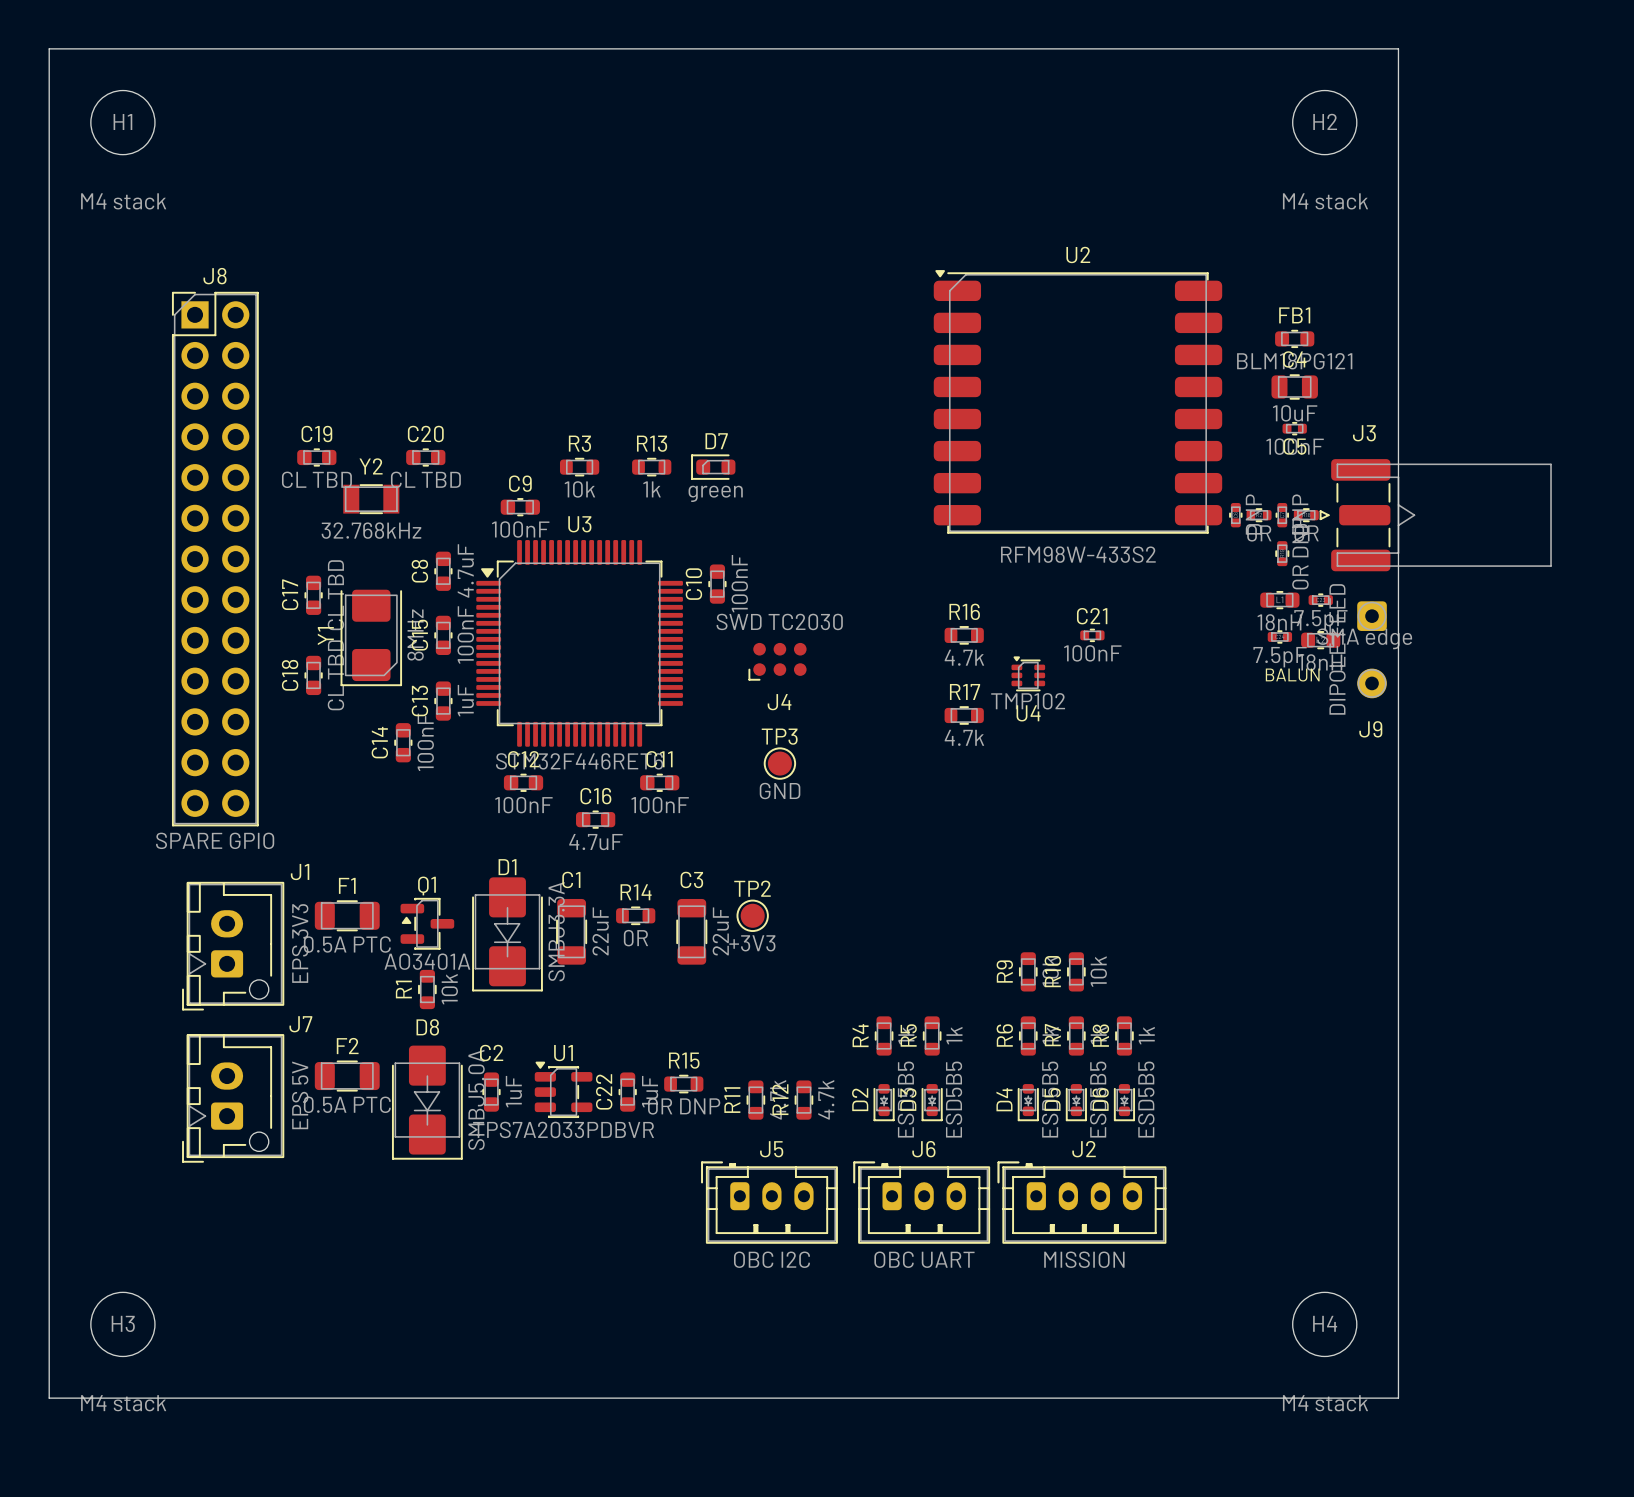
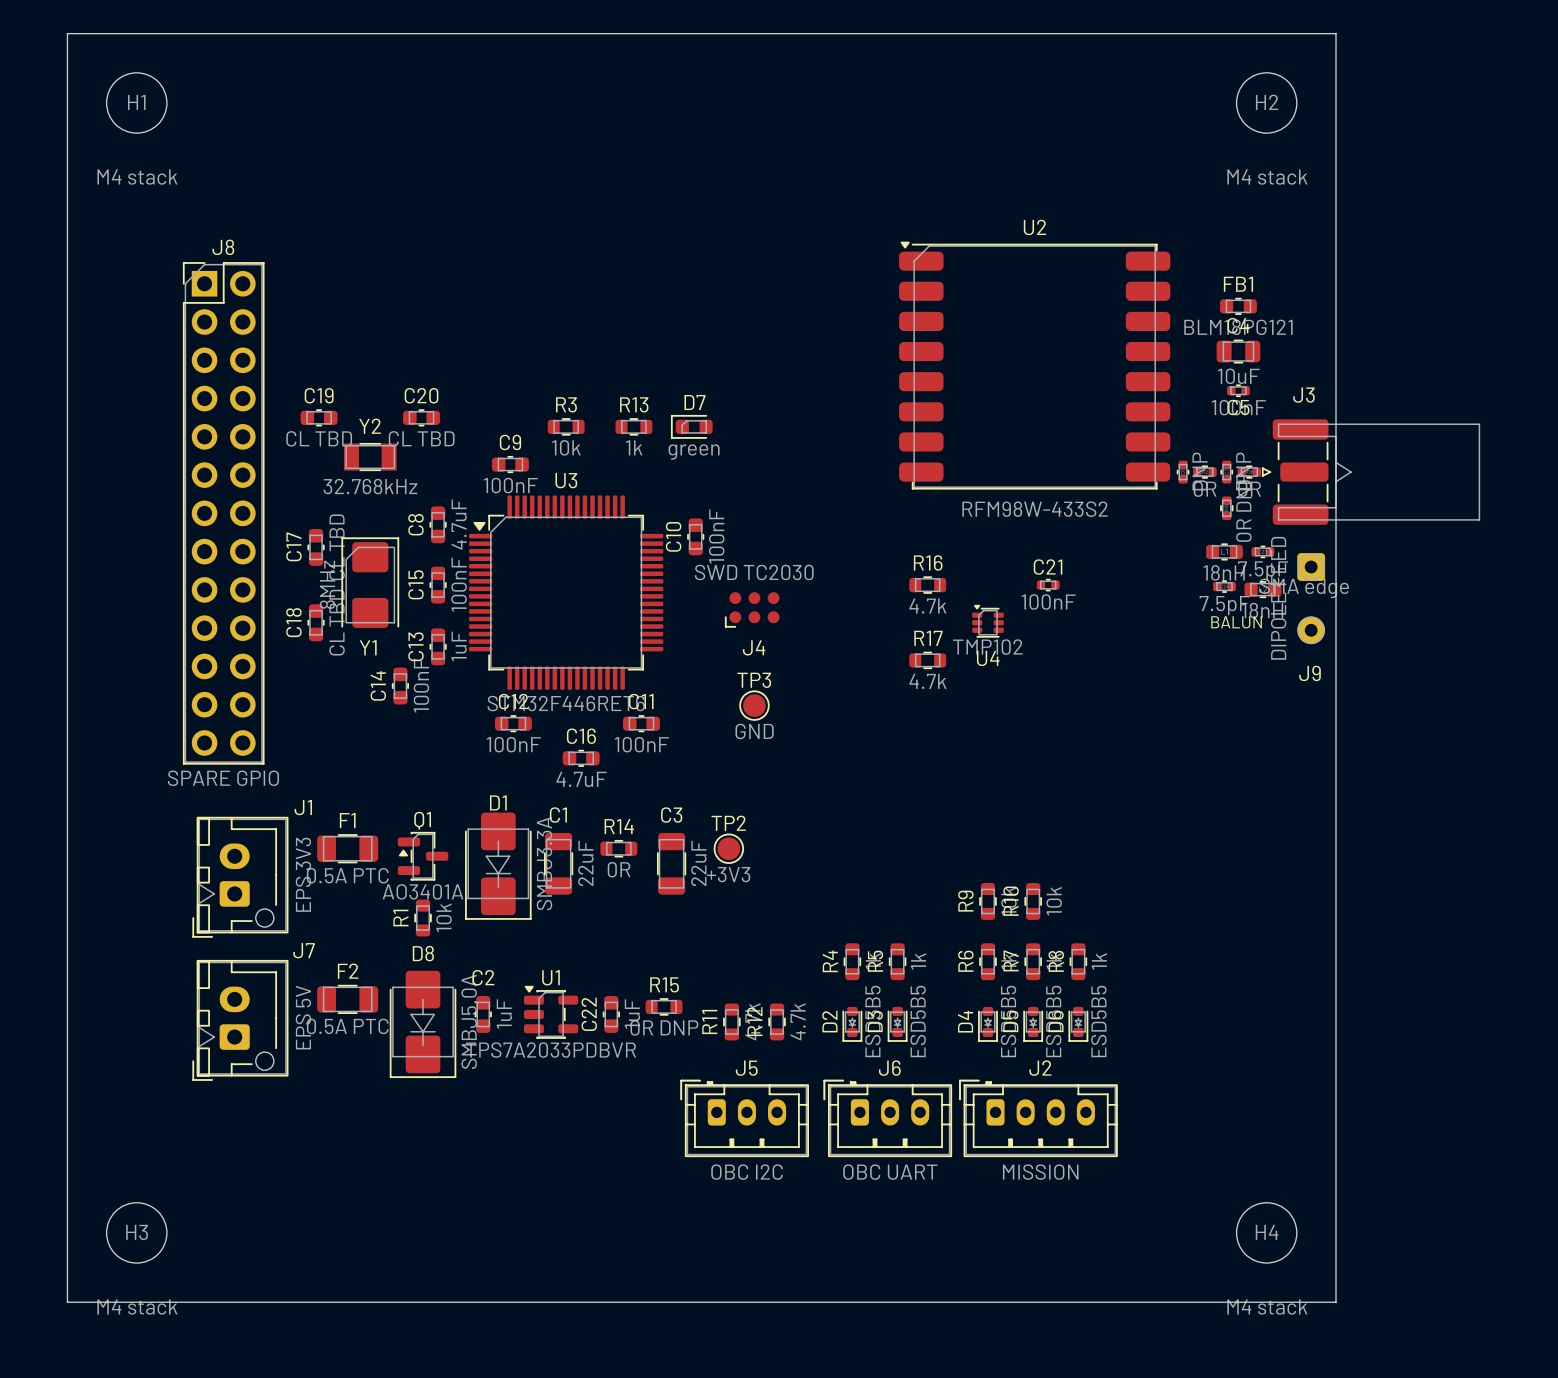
Y1 name position: Y1 (325, 636) -> Y1 (368, 647)
Y1 rotation: 0° (371, 637) -> 180° (370, 582)

